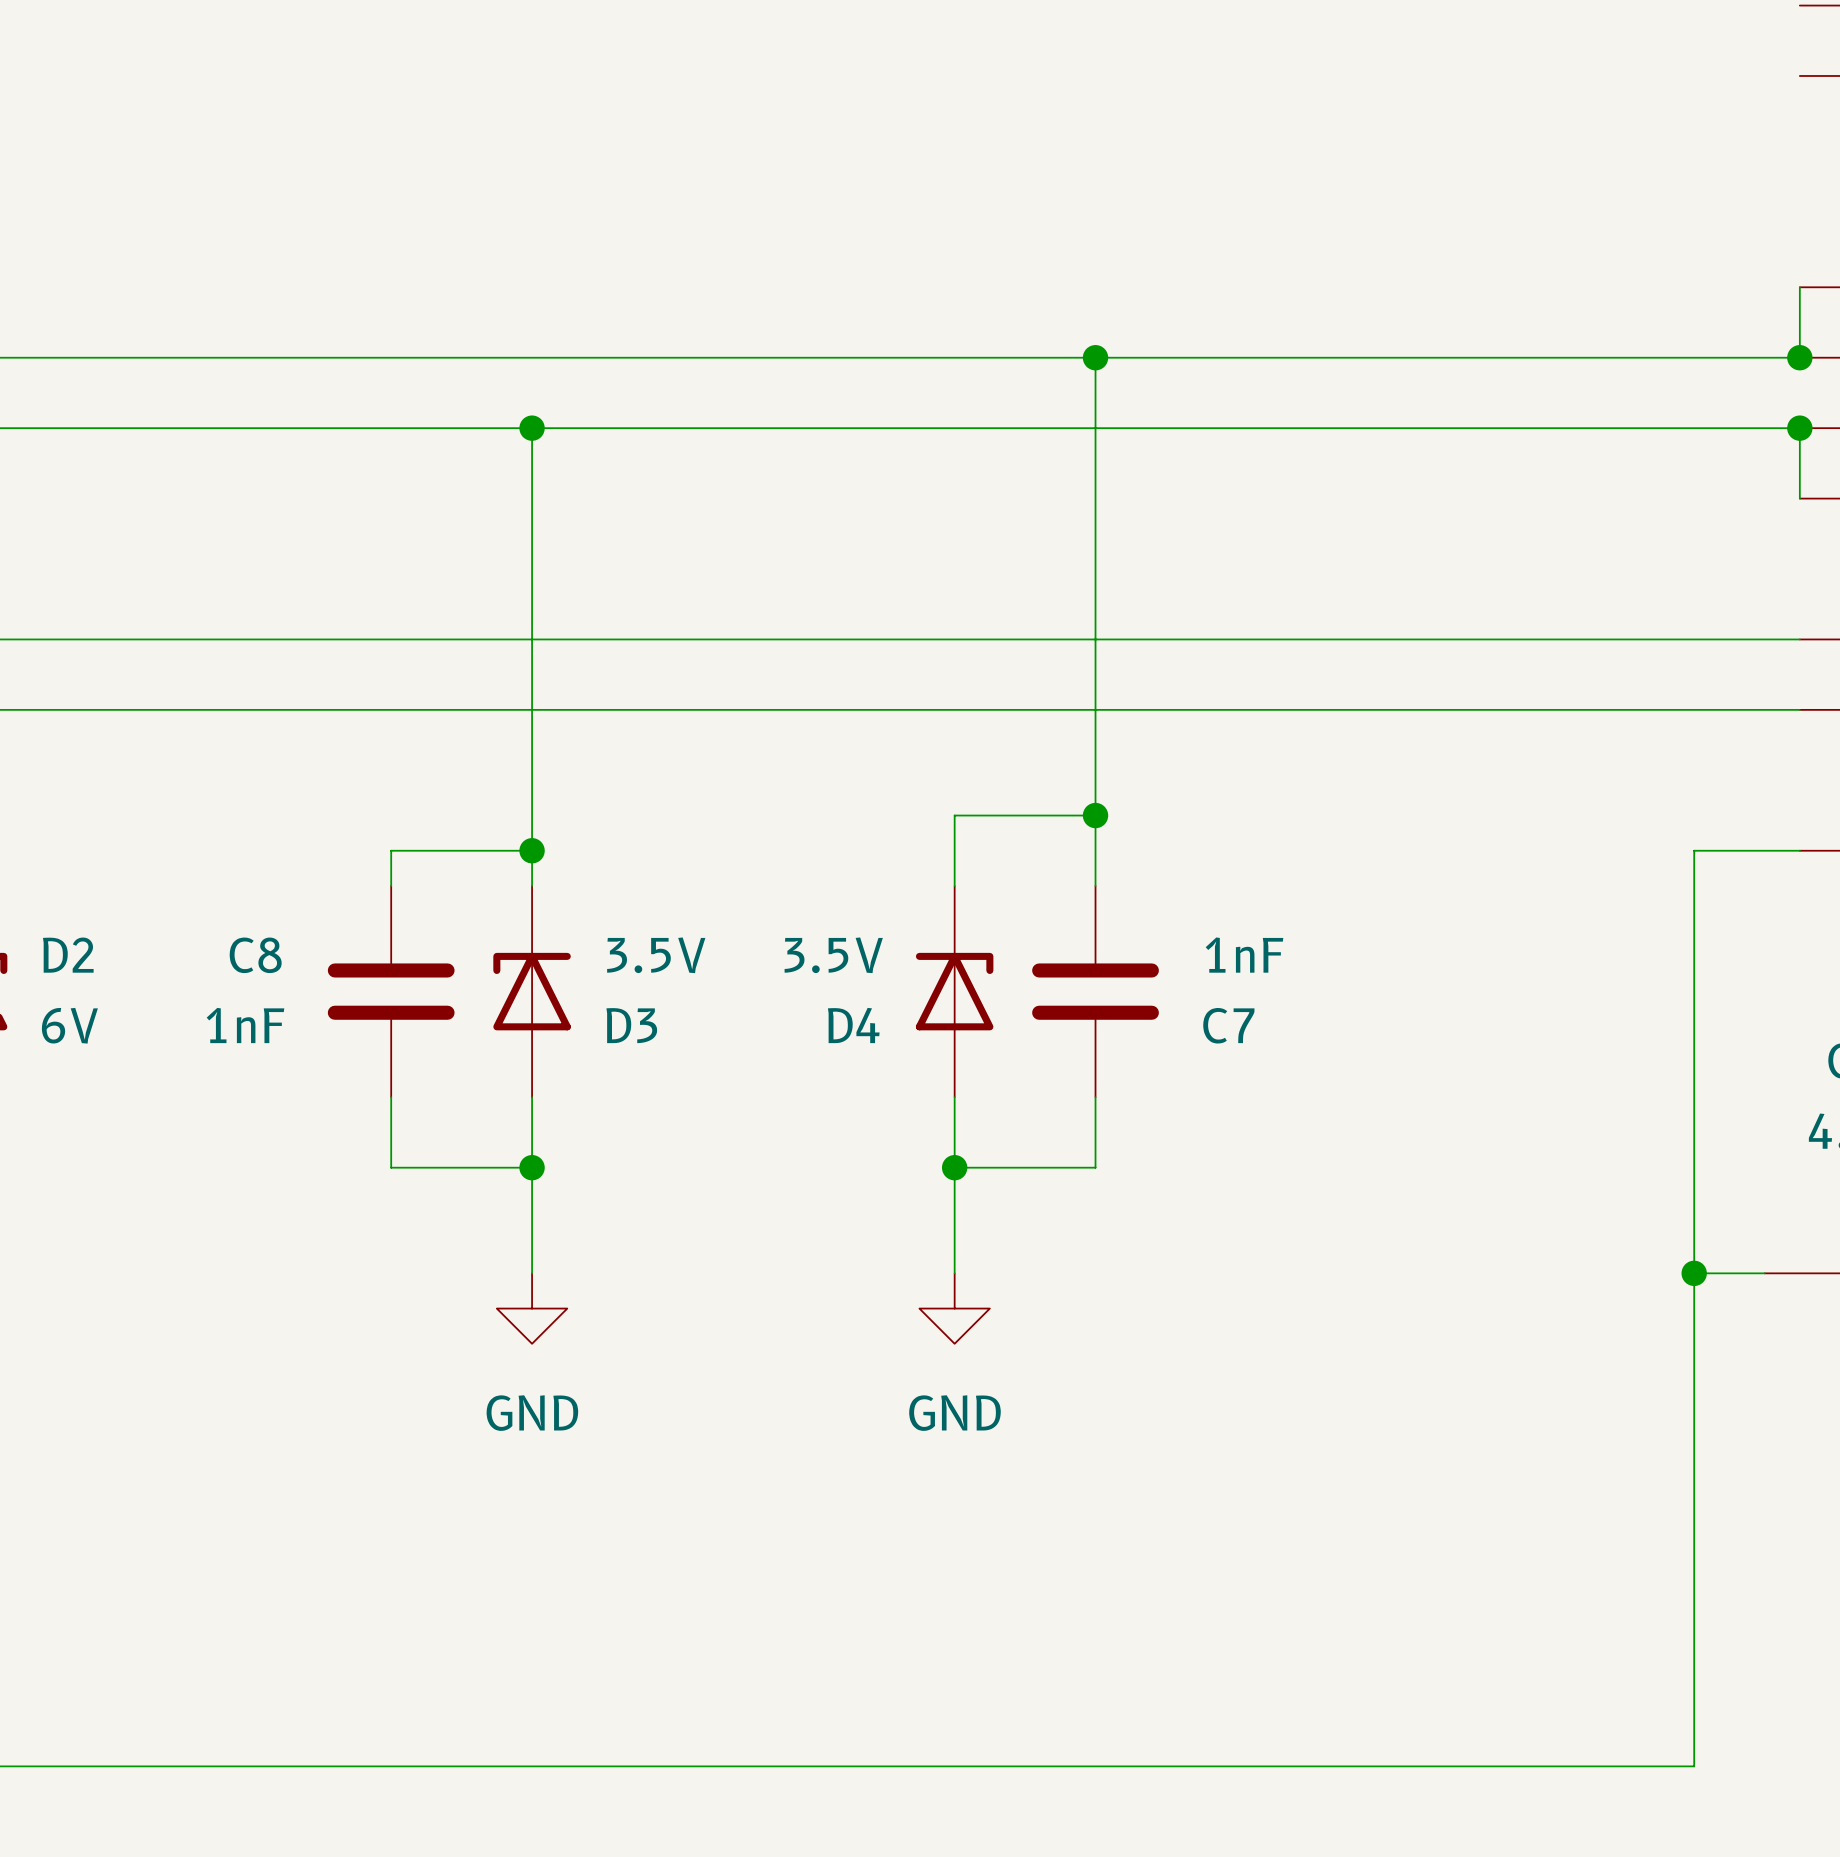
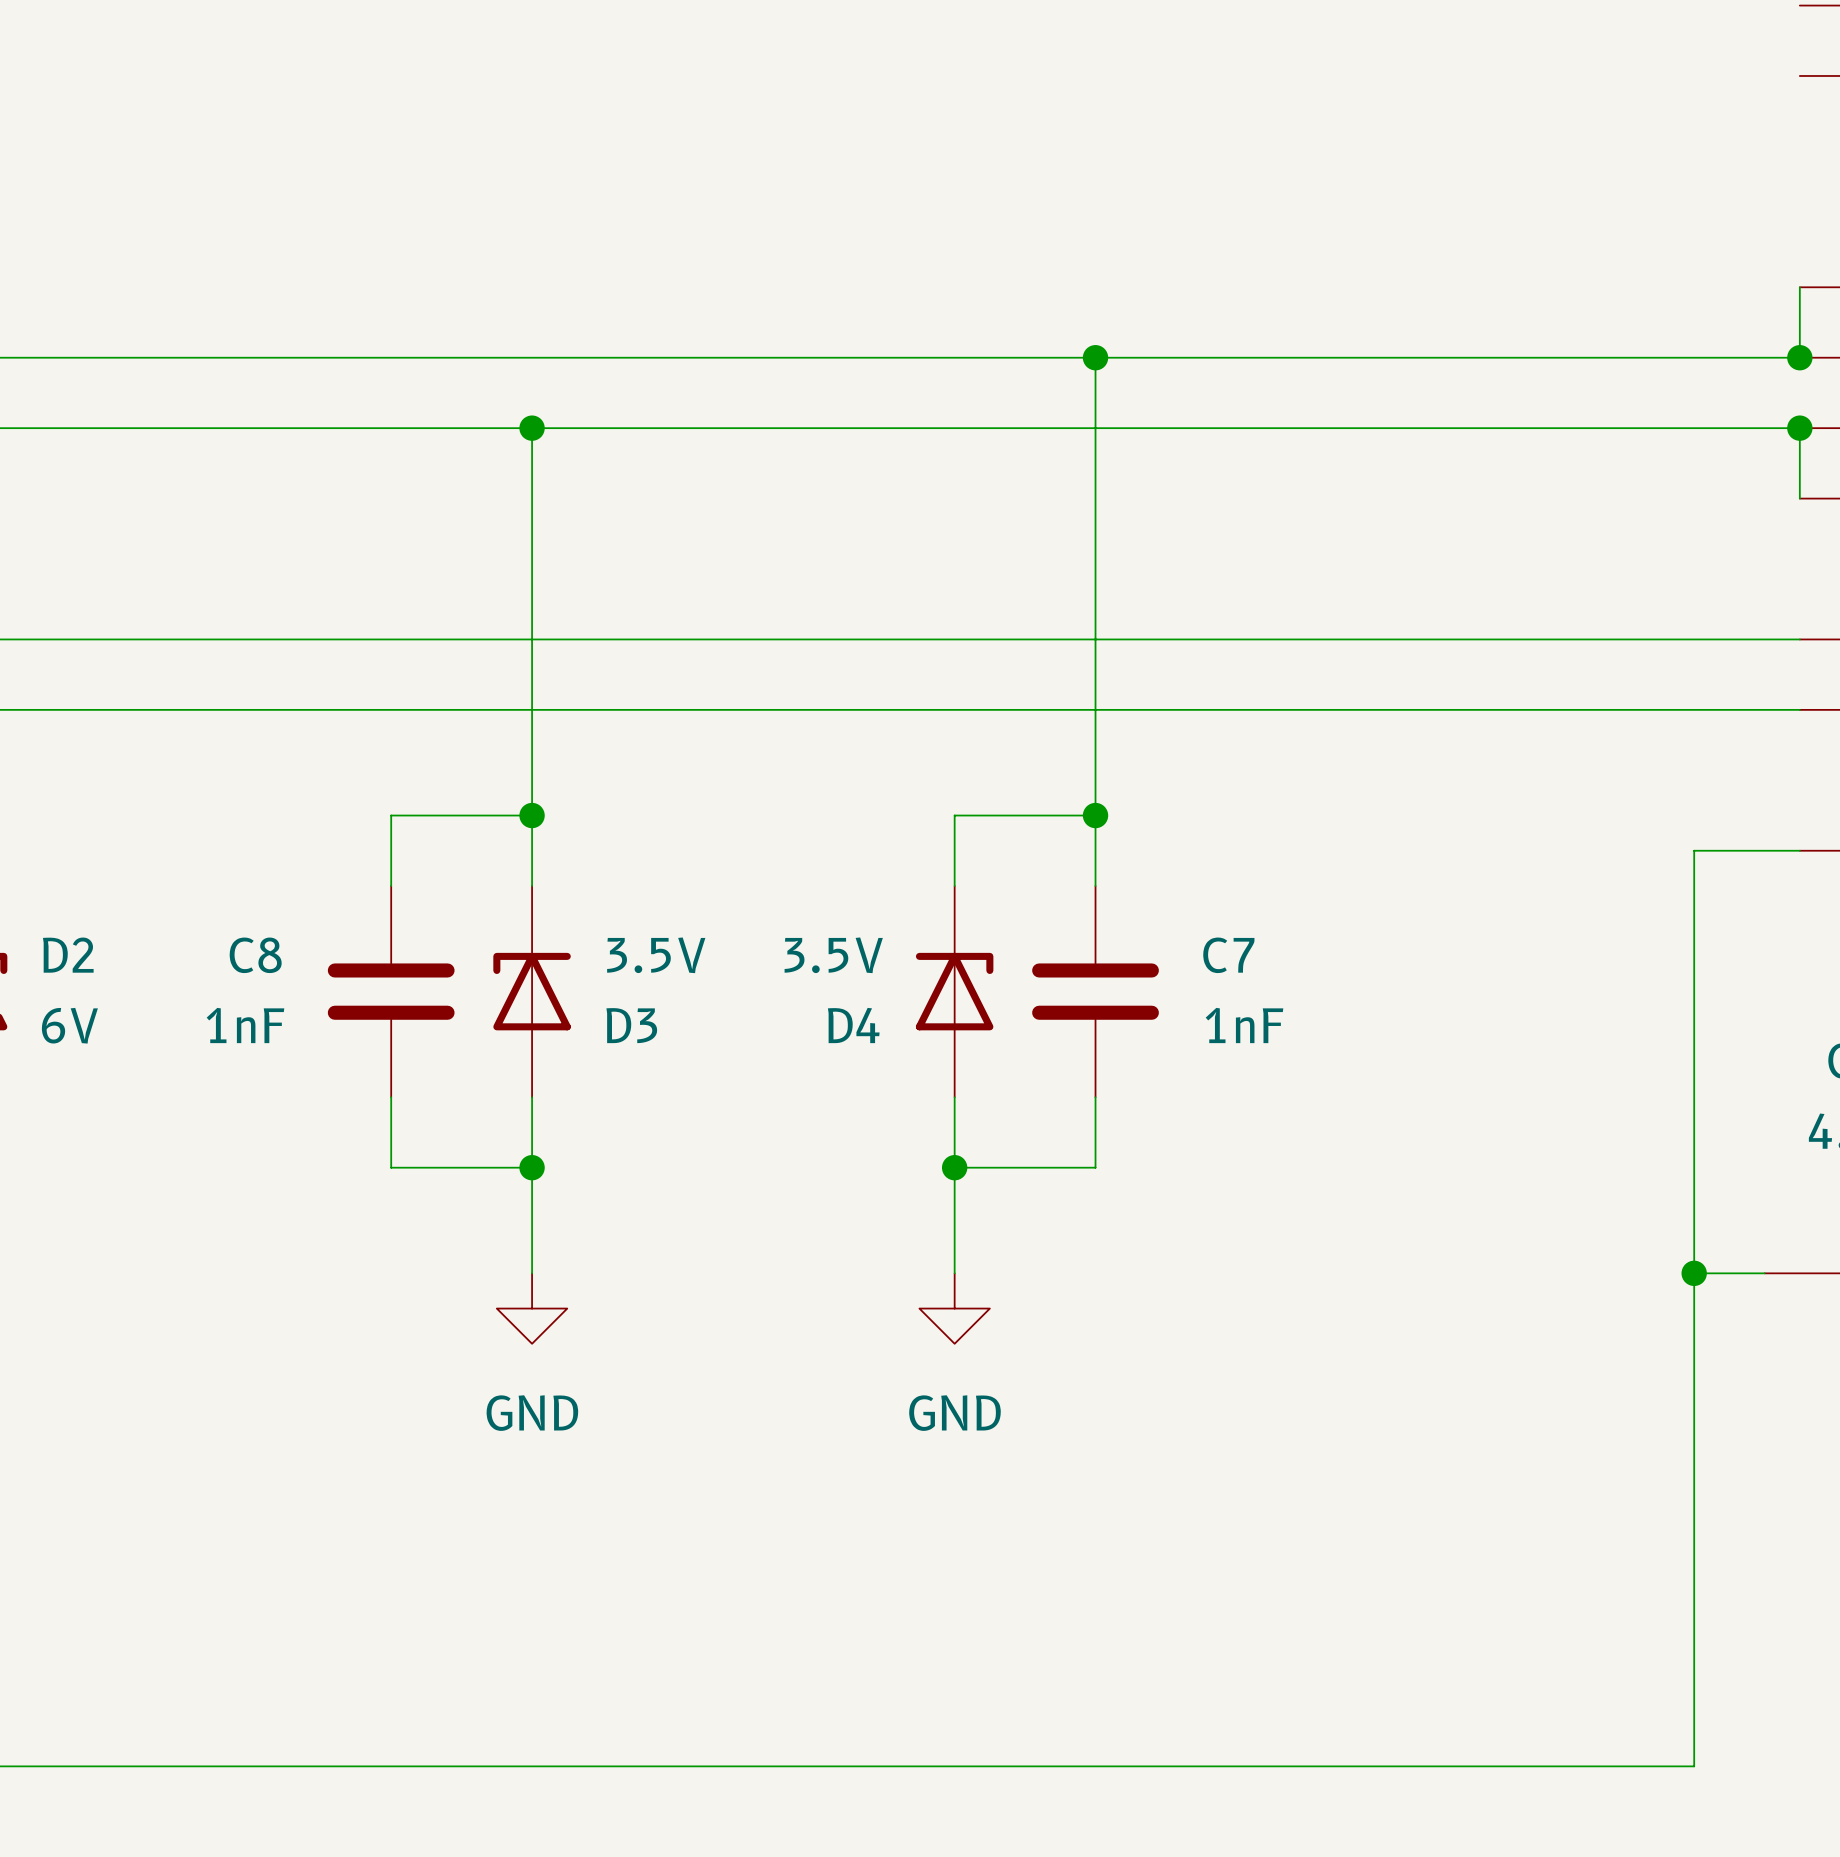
wire: (391, 850) (532, 850) -> (391, 850) (391, 815) (532, 815)
junction position: (532, 850) -> (532, 815)
C7 value position: 1nF (1244, 955) -> 1nF (1244, 1025)
C7 name position: C7 (1228, 1025) -> C7 (1228, 955)

